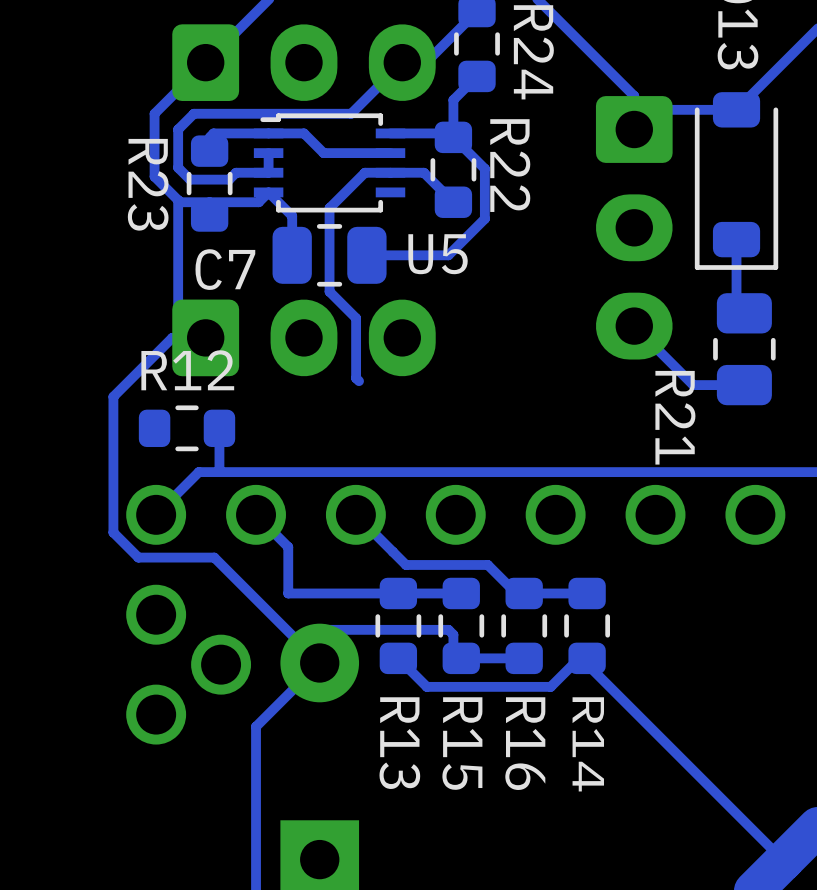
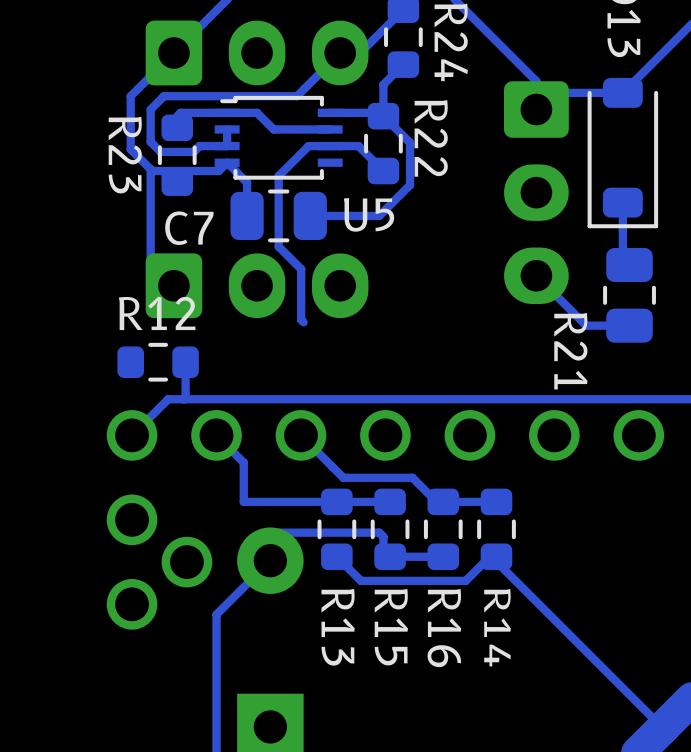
track: (205, 337) (172, 337) (113, 396) (113, 532) (138, 557) (214, 557) (319, 662) -> none

